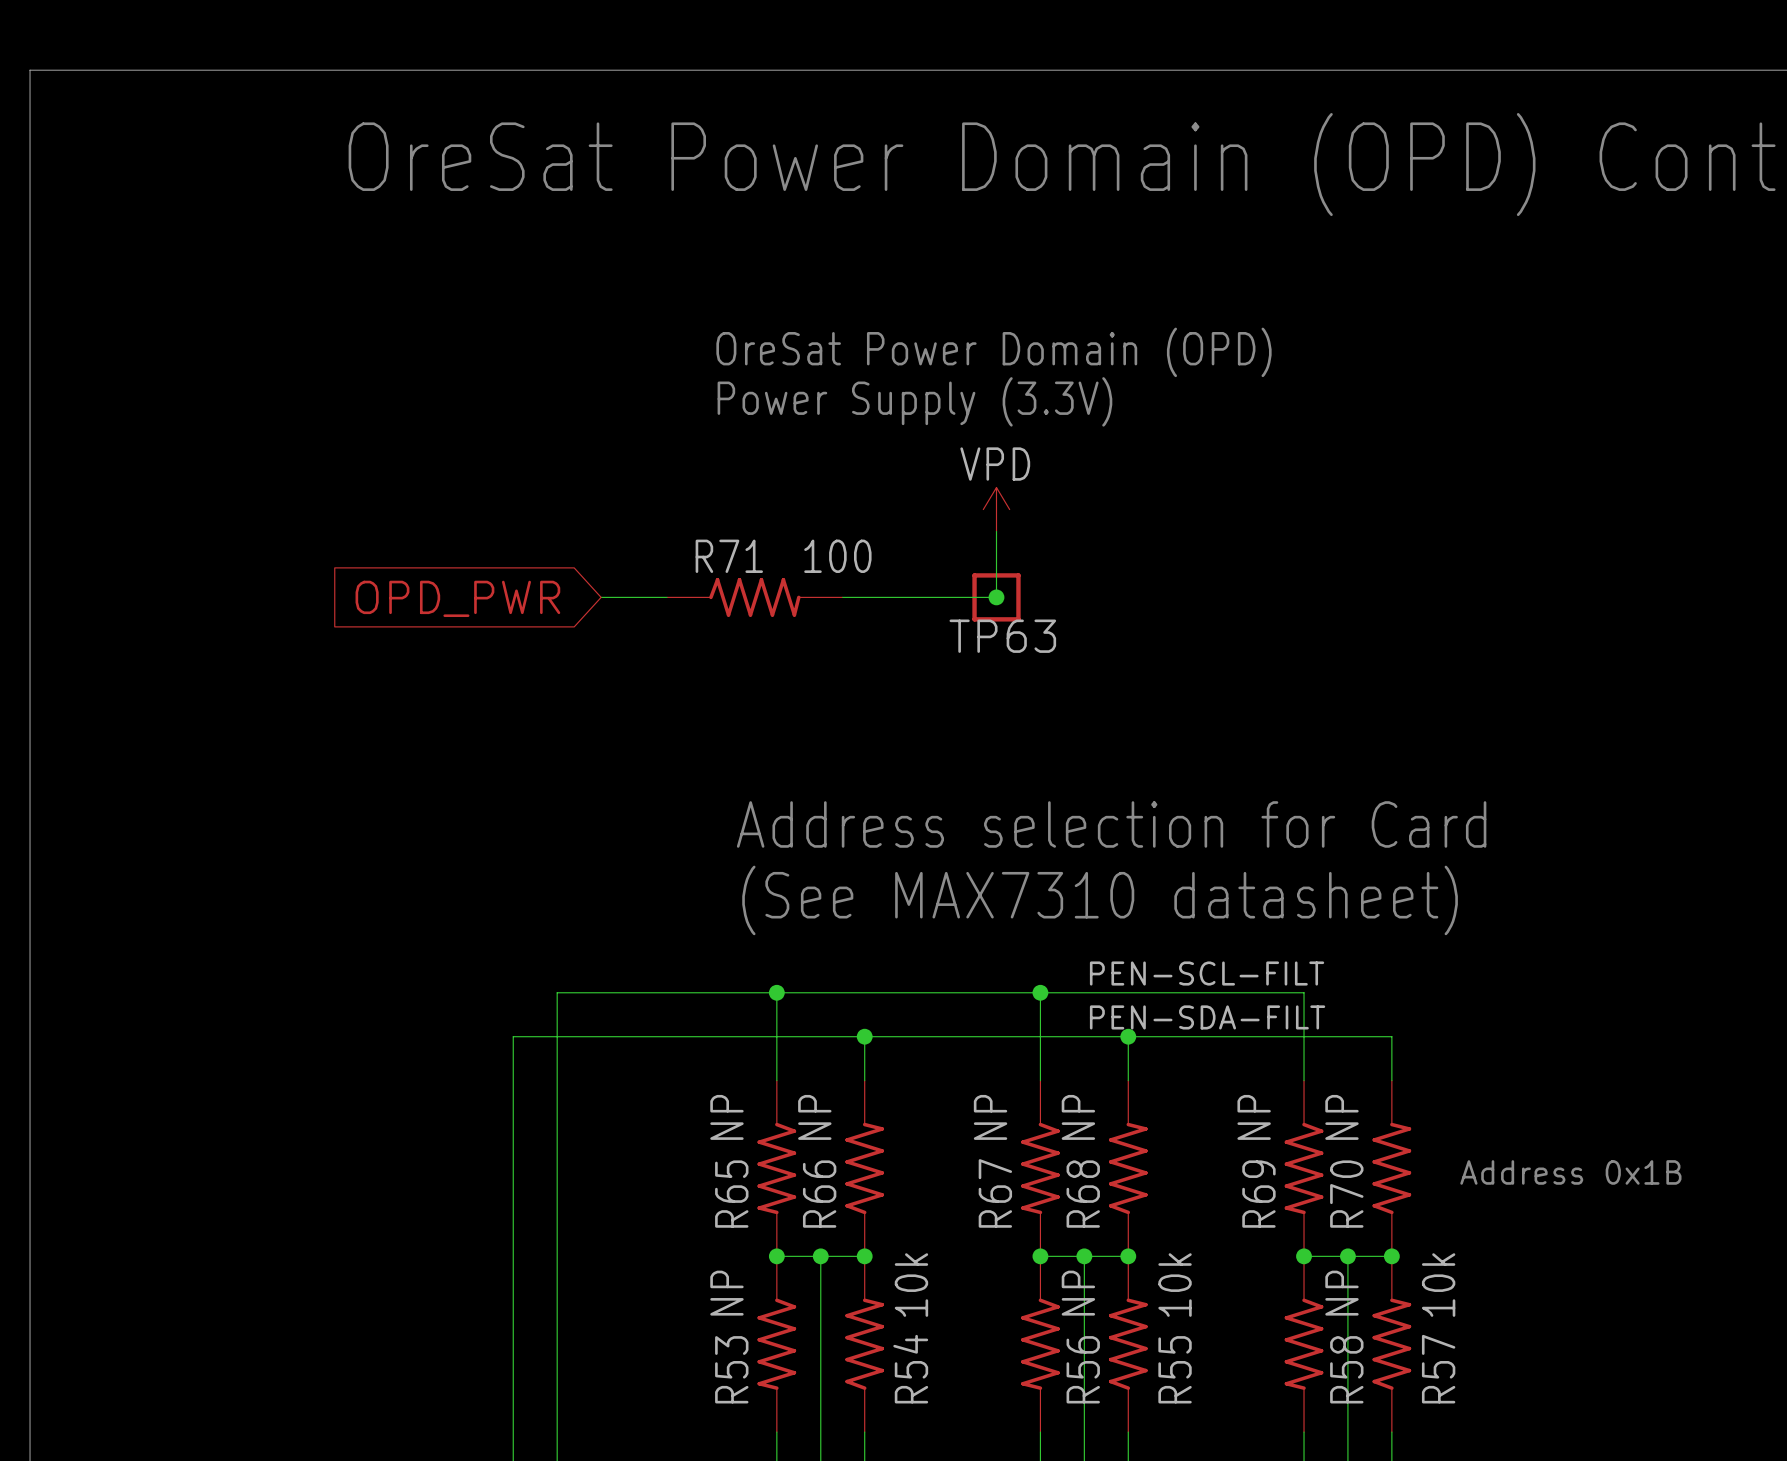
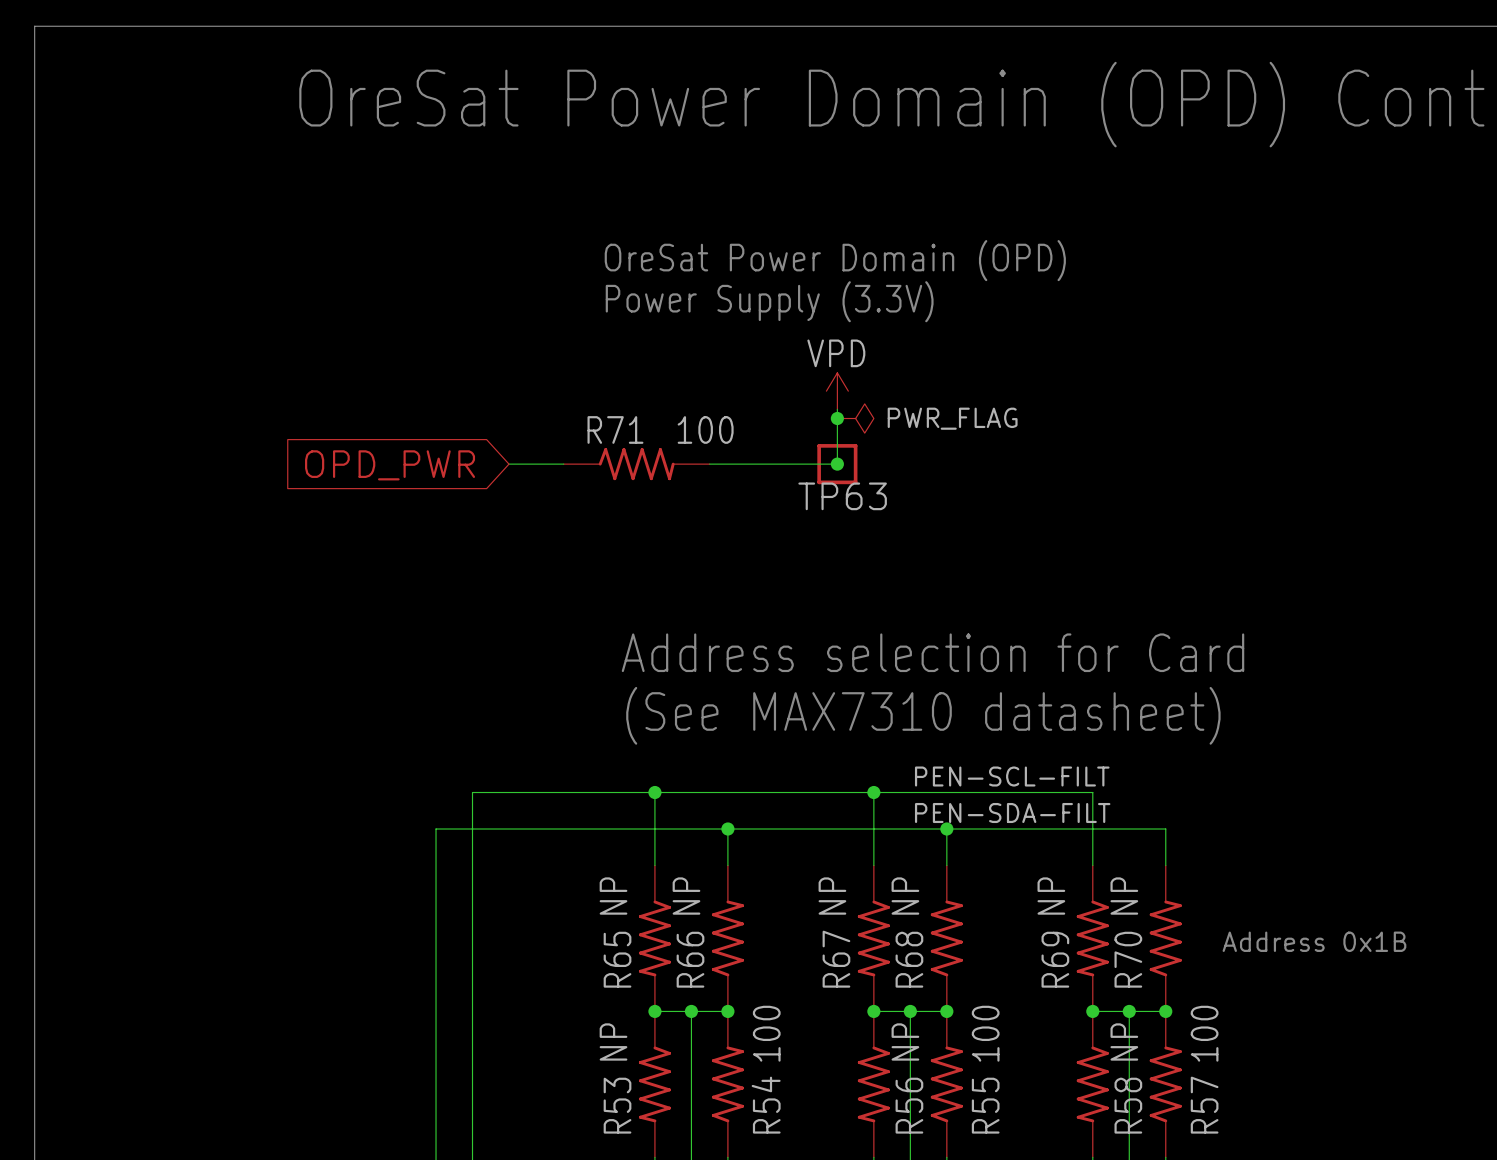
junction: none -> (837, 418)
power symbol: none -> PWR_FLAG (855, 418)
R54 value: 10k (911, 1285) -> 100 (766, 1033)
R55 value: 10k (1175, 1285) -> 100 (985, 1033)
R57 value: 10k (1438, 1285) -> 100 (1204, 1033)

